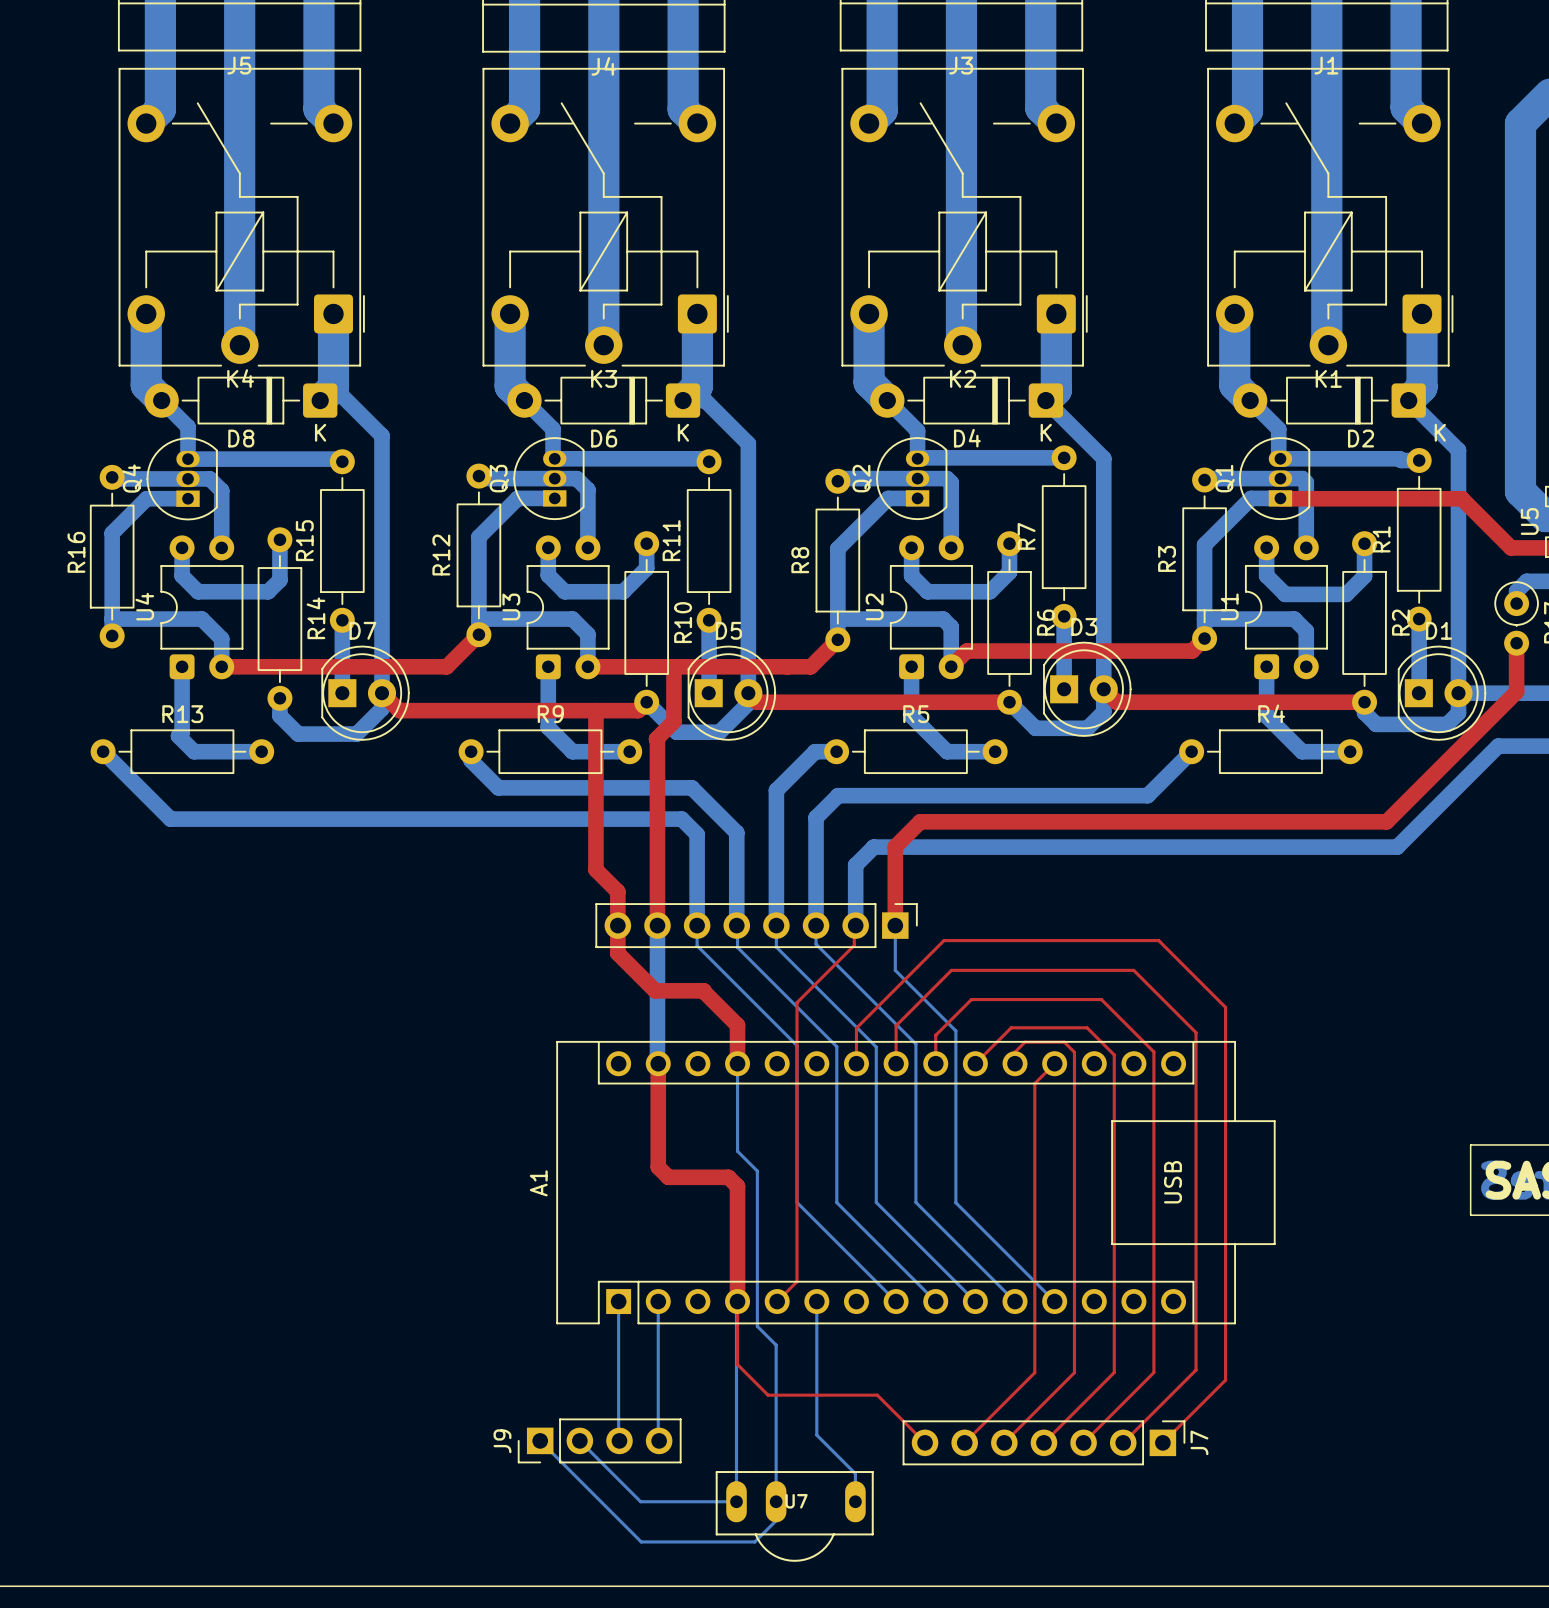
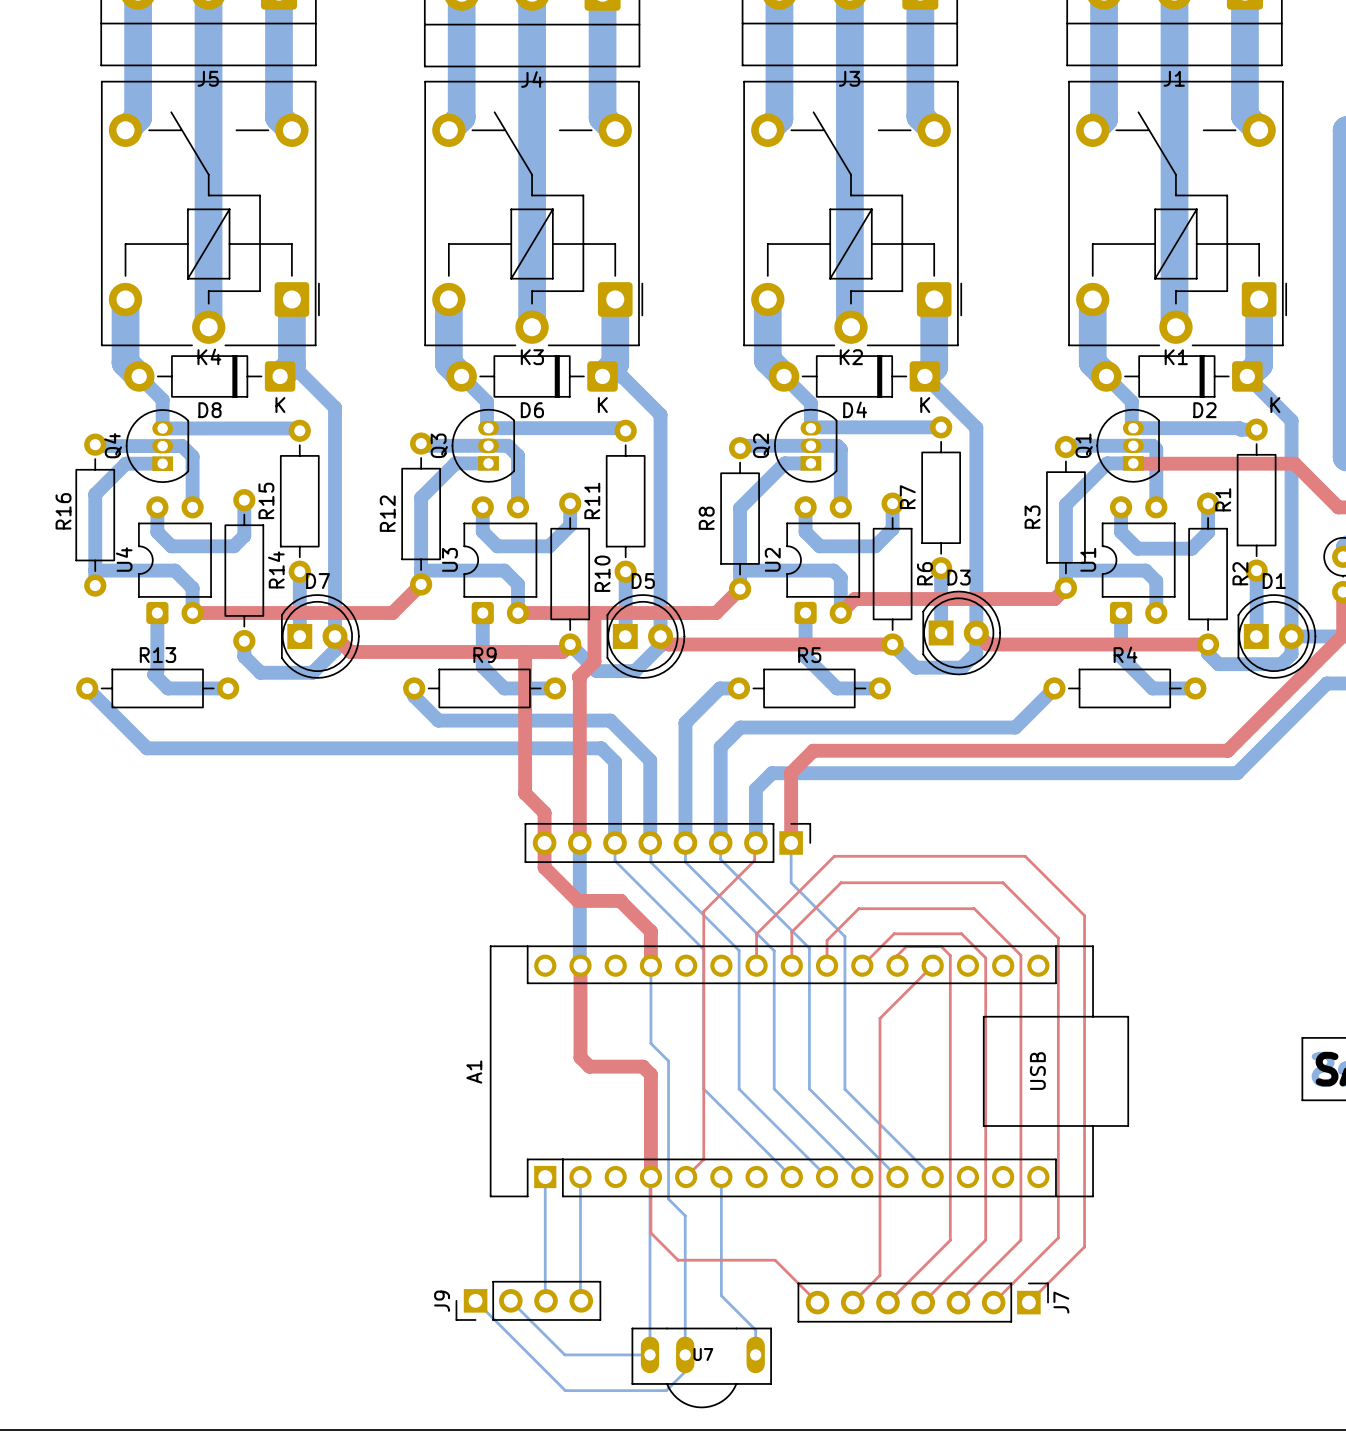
top track: (1034, 1083) (1034, 1372) (995, 1412) -> (915, 983) (880, 1018) (880, 1275)

